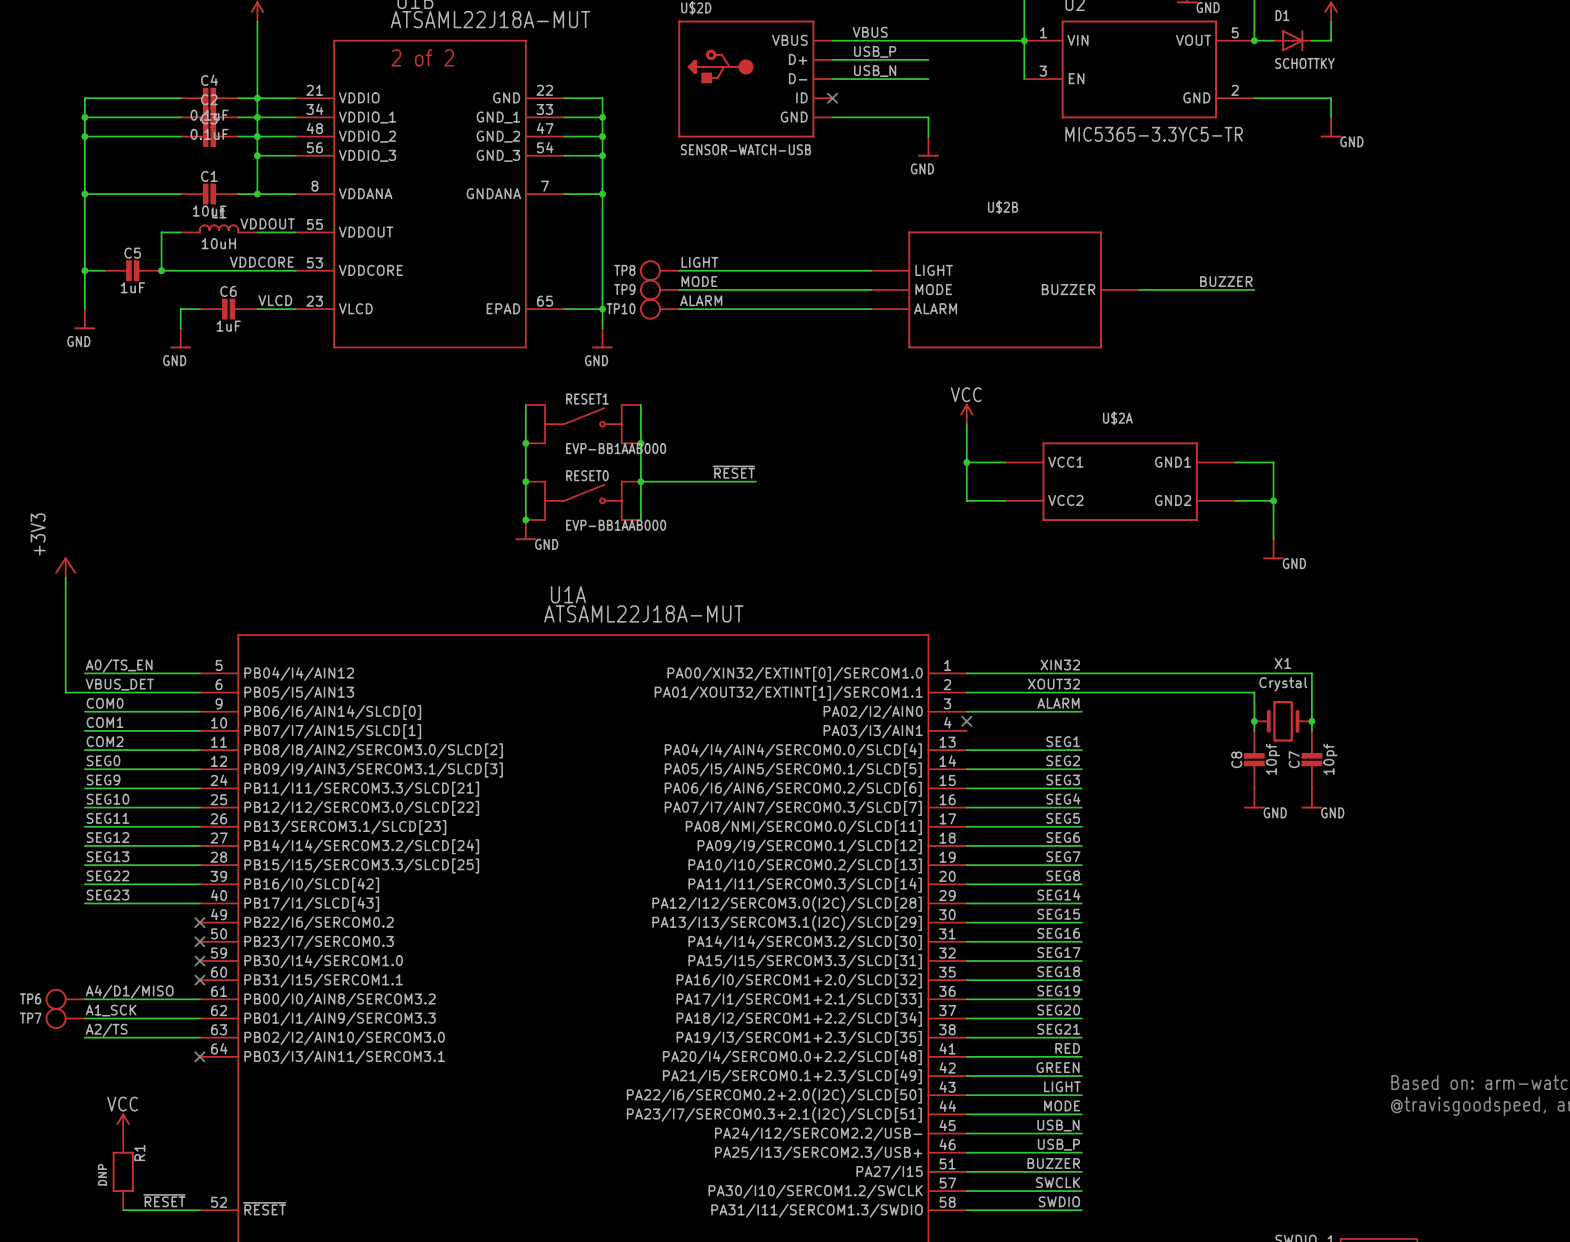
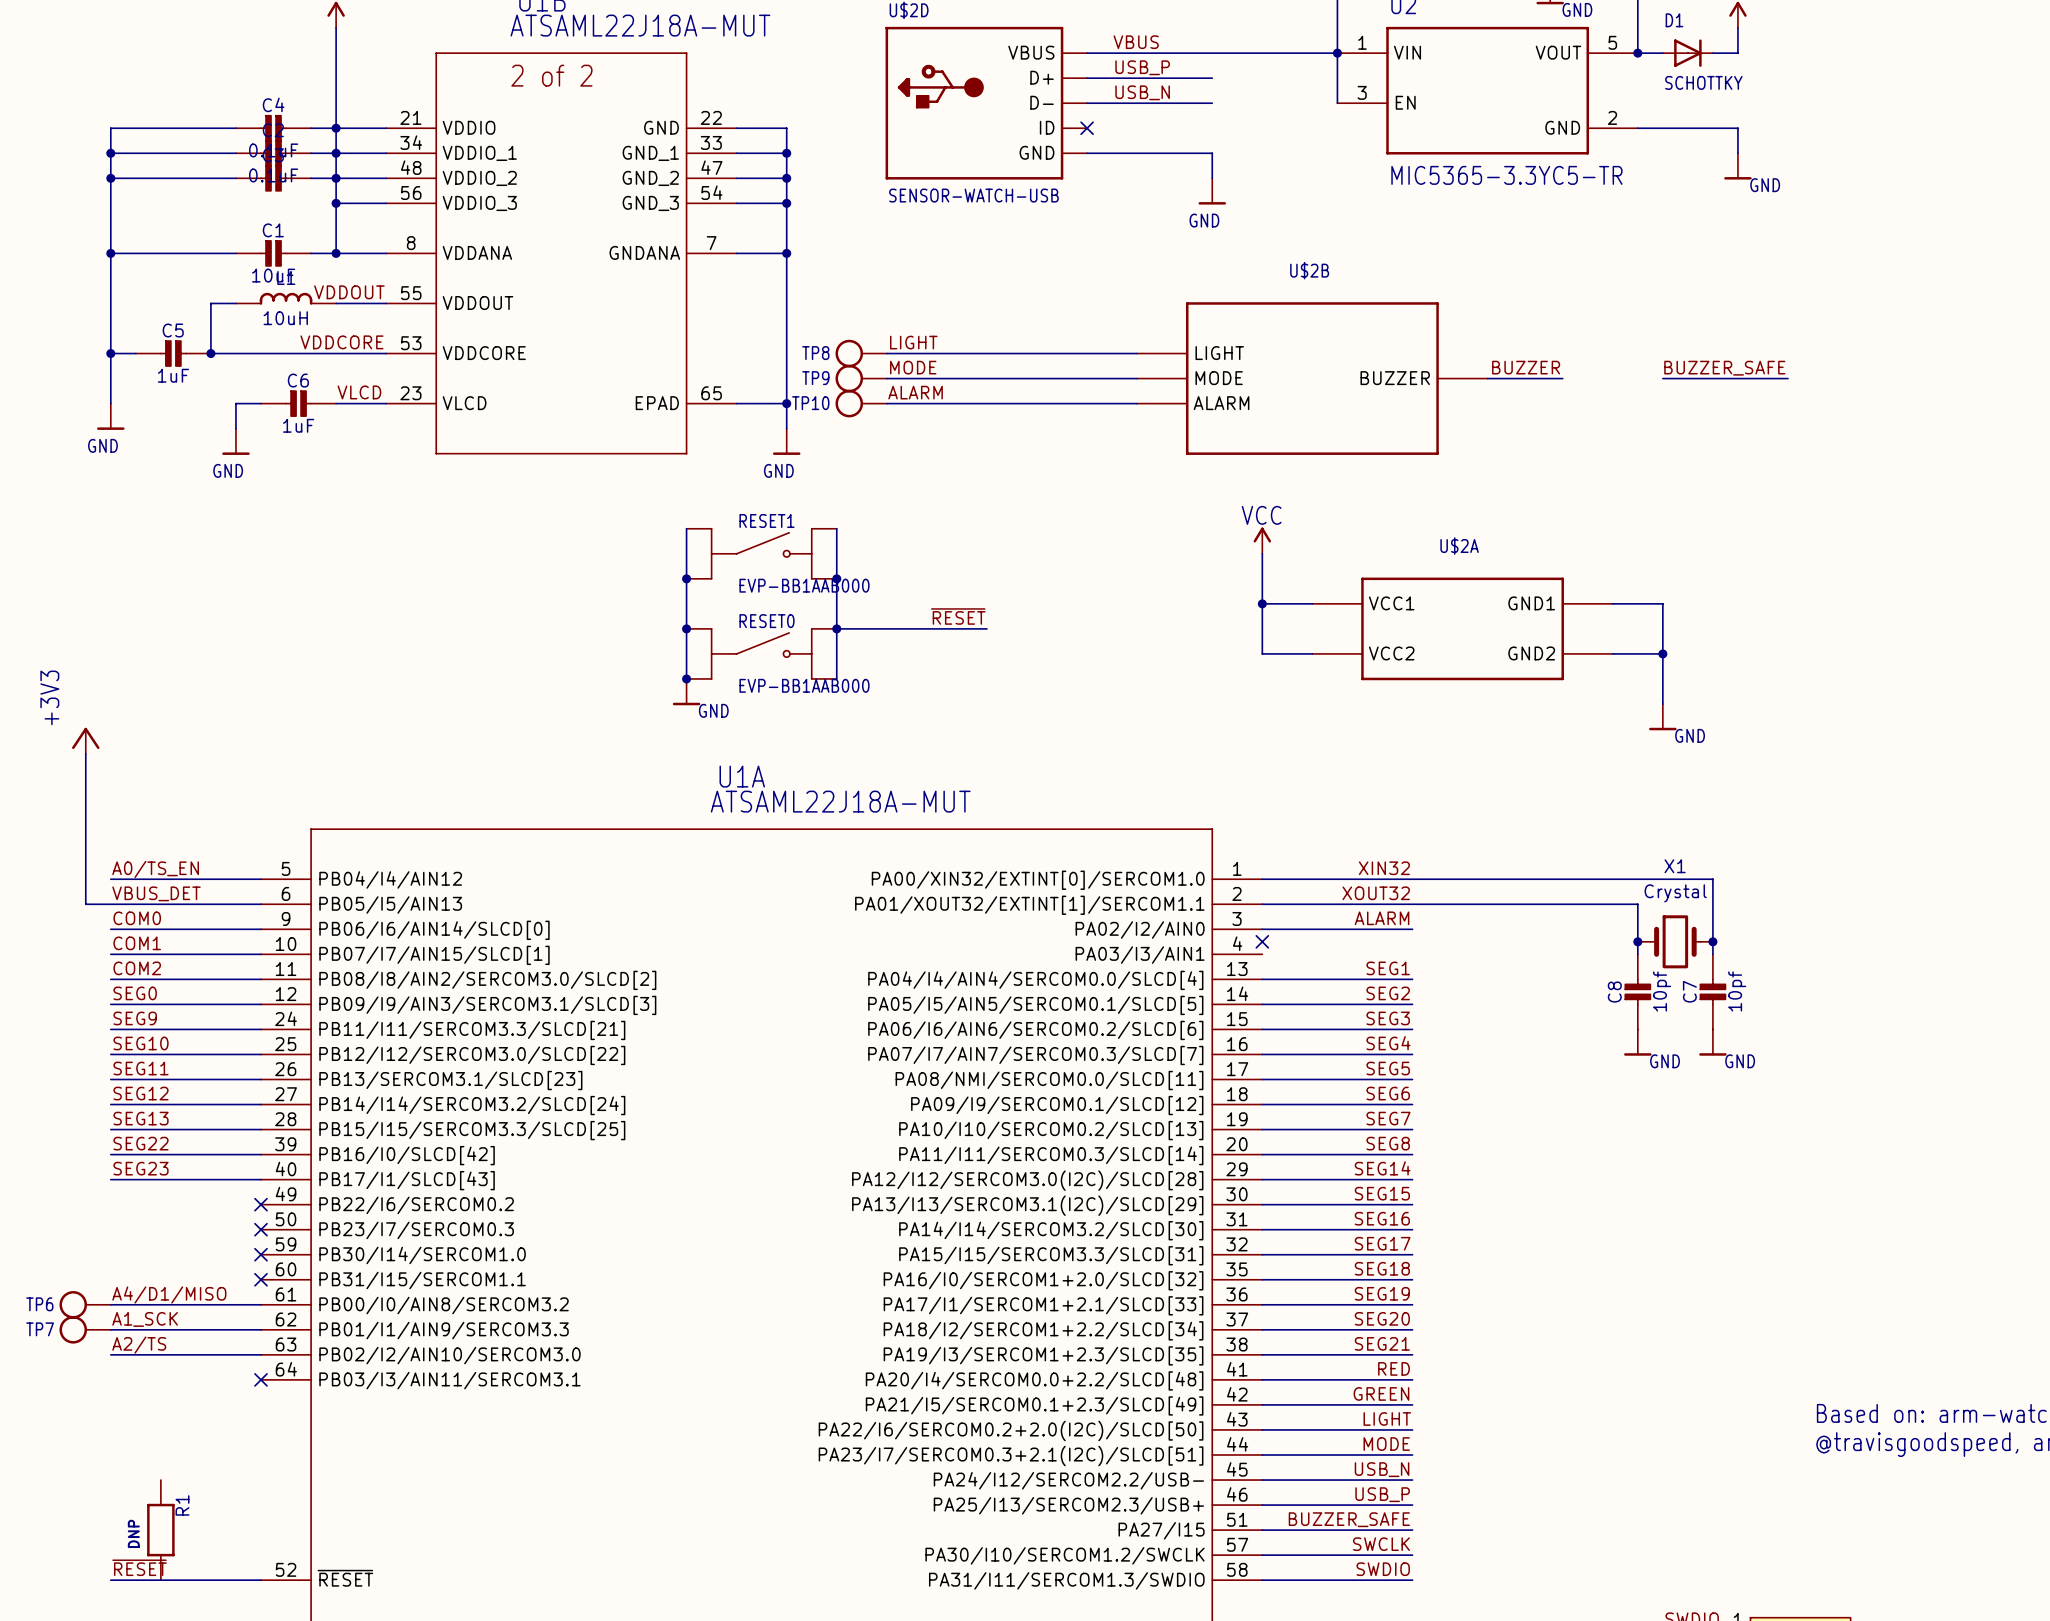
label position: BUZZER (1226, 281) -> BUZZER (1526, 367)
label: none -> BUZZER_SAFE (1724, 368)
wire: (1196, 289) (1254, 289) -> none
wire: none -> (1662, 378) (1788, 378)
power symbol: VCC (123, 1123) -> none
label: BUZZER (1053, 1163) -> BUZZER_SAFE (1349, 1519)
label position: ~{RESET} (164, 1200) -> ~{RESET} (139, 1567)
wire: none -> (110, 1580) (160, 1580)

